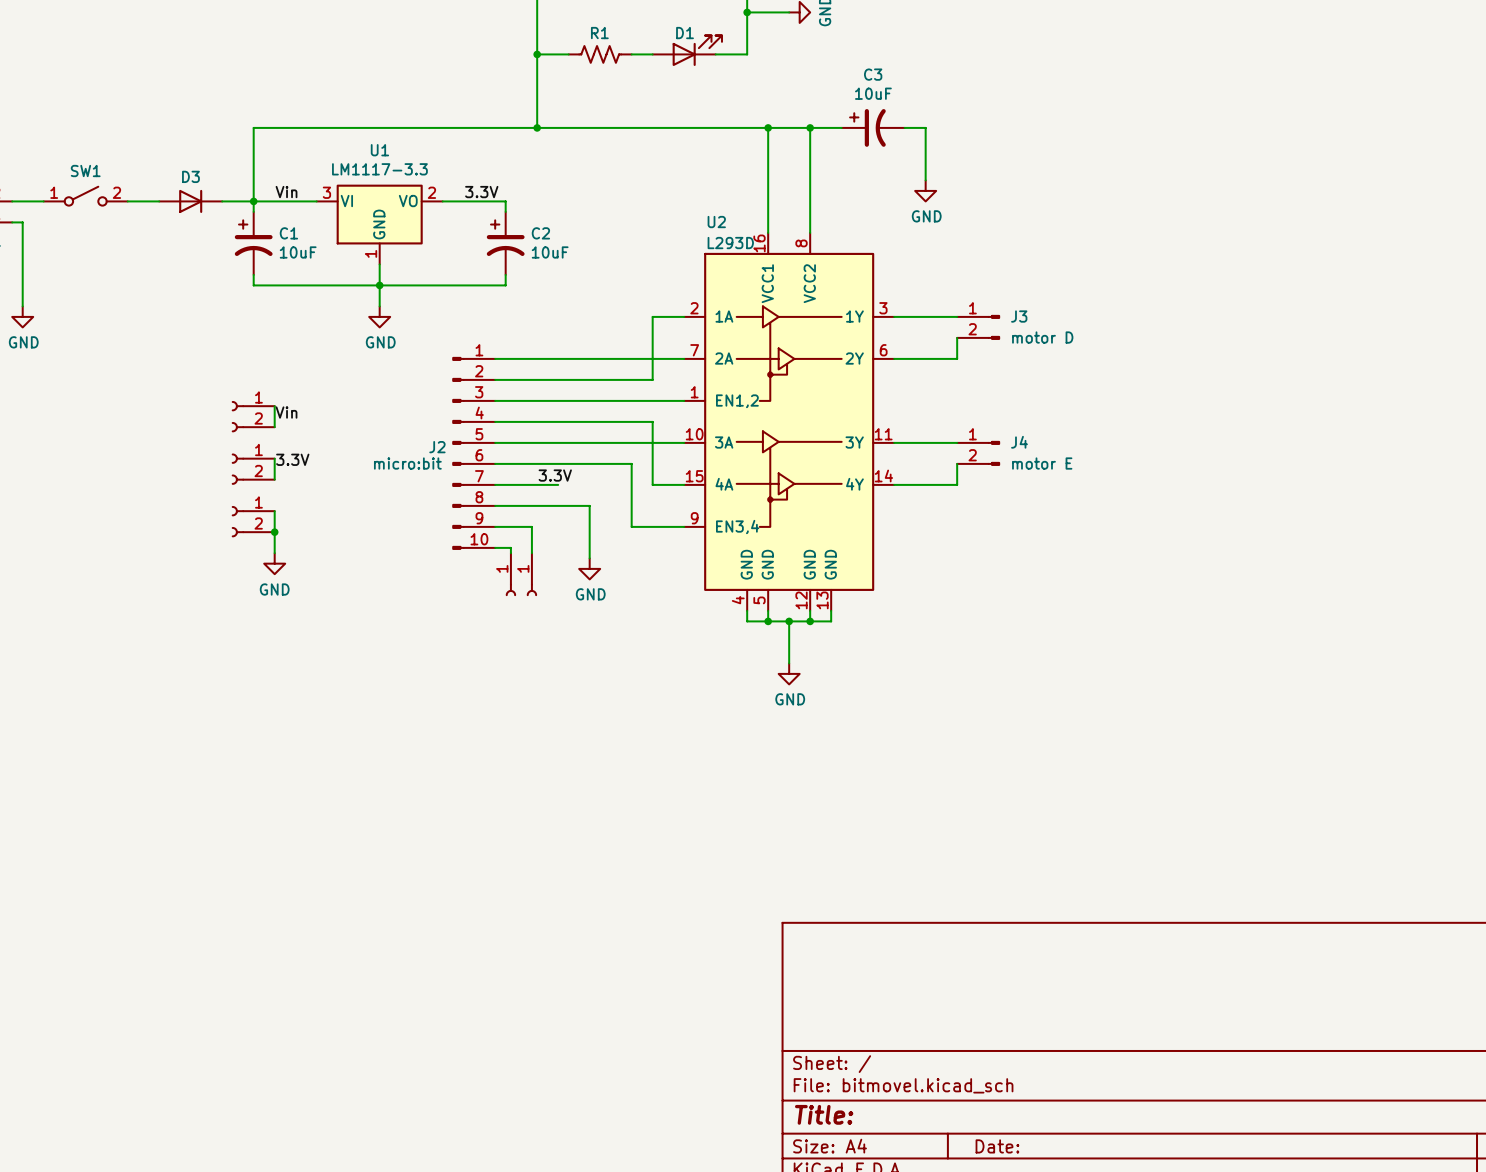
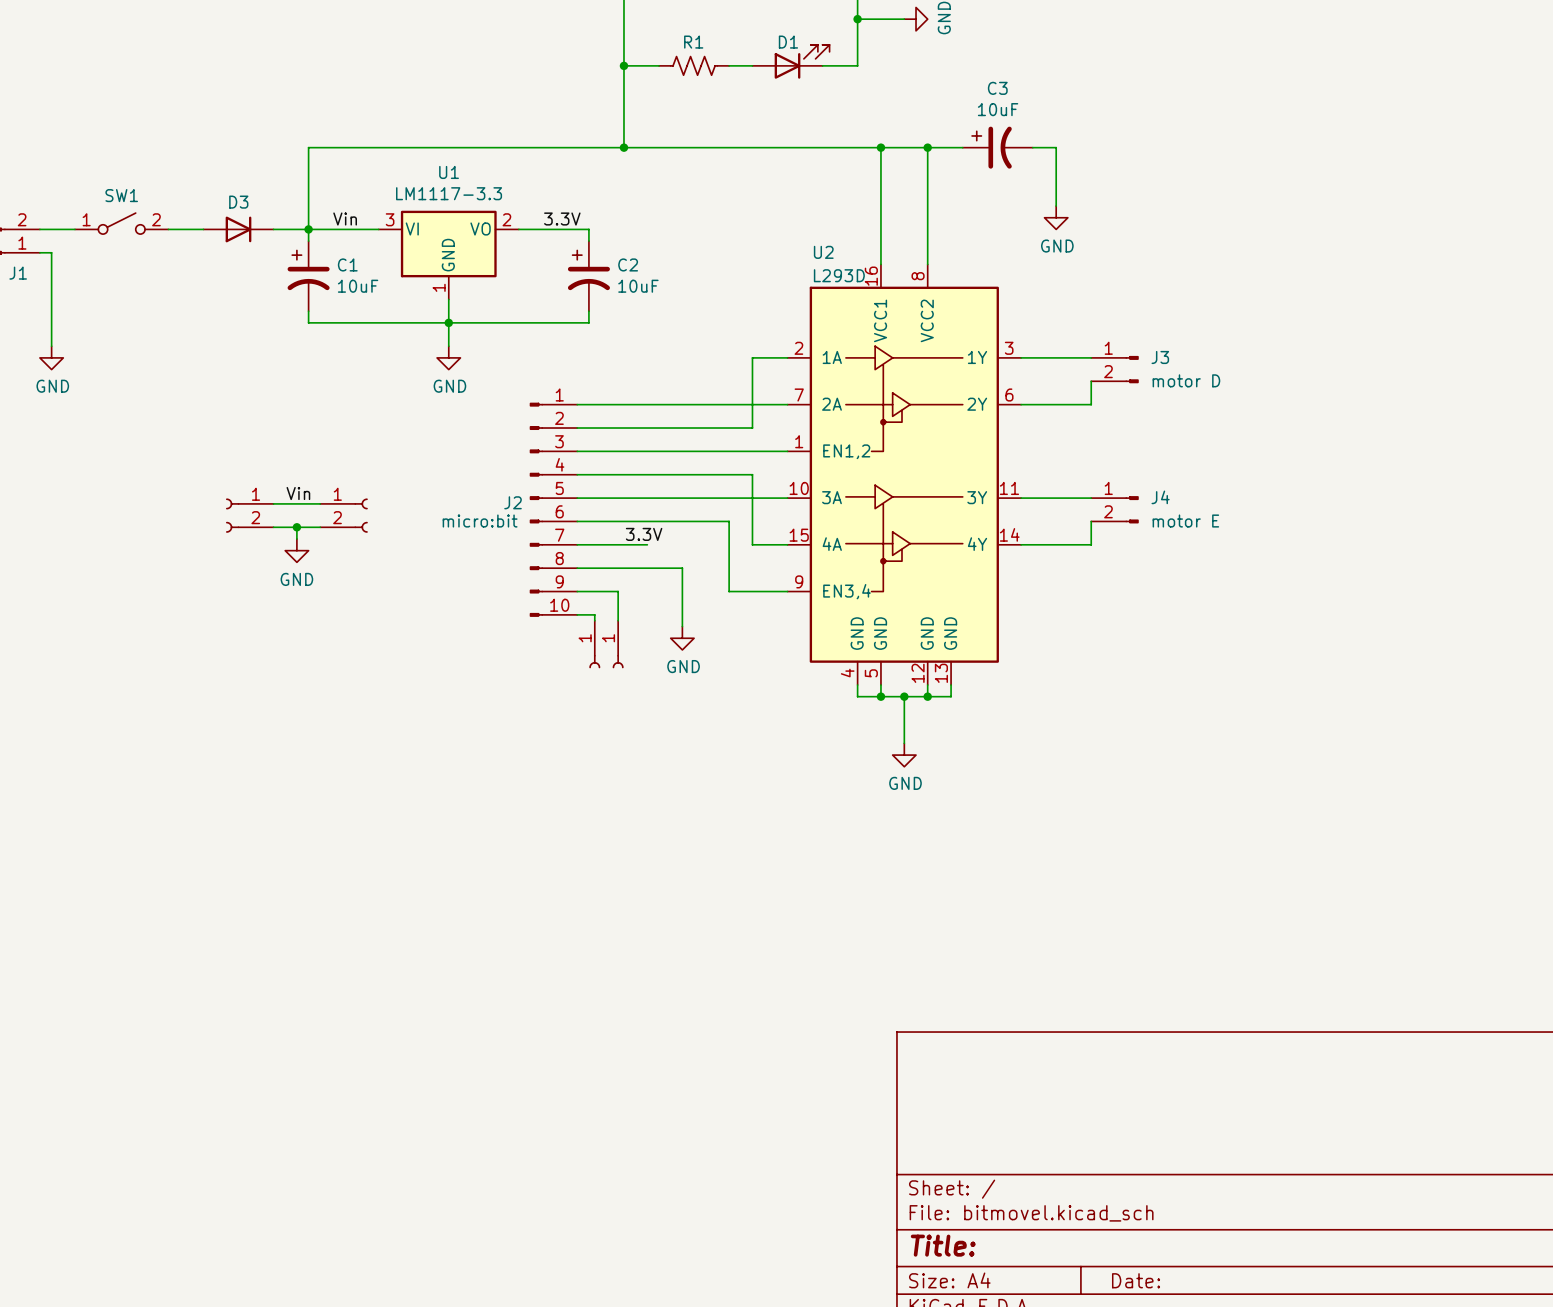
wire: (274, 406) (274, 427) -> none
label position: Vin (286, 412) -> Vin (298, 493)
part: (253, 416) -> none
wire: none -> (273, 503) (320, 503)
part: none -> (249, 515)
wire: (274, 458) (274, 479) -> none
part: none -> (343, 515)
label: 3.3V (292, 459) -> none
wire: none -> (273, 527) (320, 527)
wire: none -> (296, 527) (296, 538)
junction: none -> (296, 527)
part: (253, 469) -> none
wire: (274, 511) (274, 553) -> none
part: (253, 521) -> none
junction: (274, 532) -> none
power symbol position: GND (274, 563) -> GND (296, 550)

